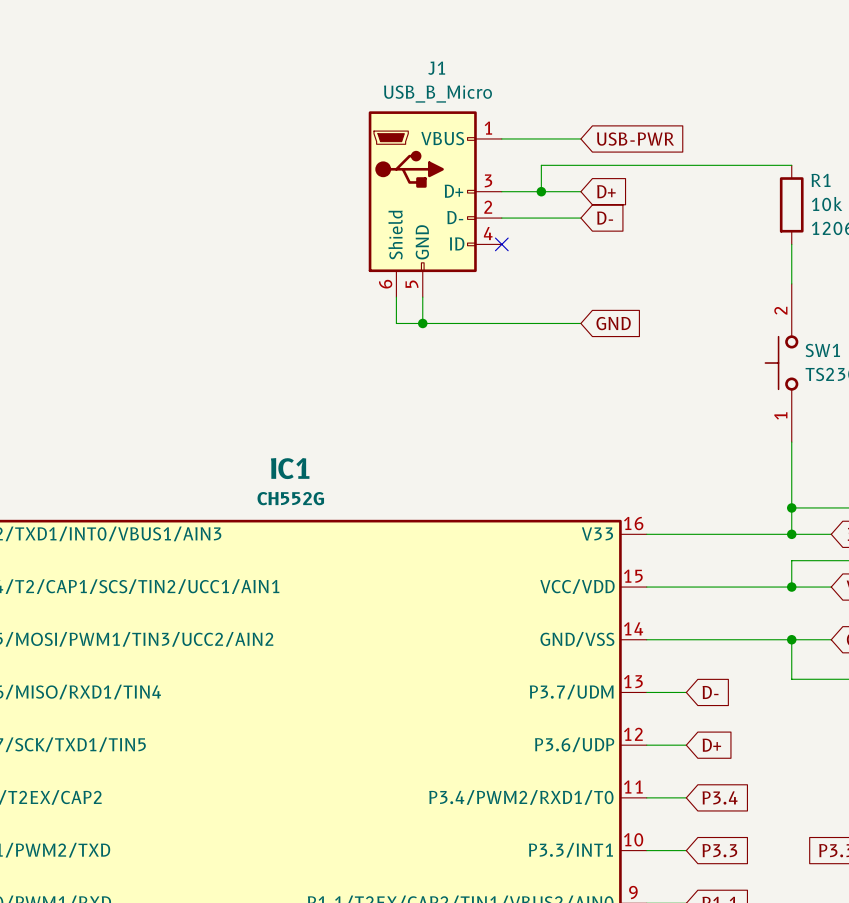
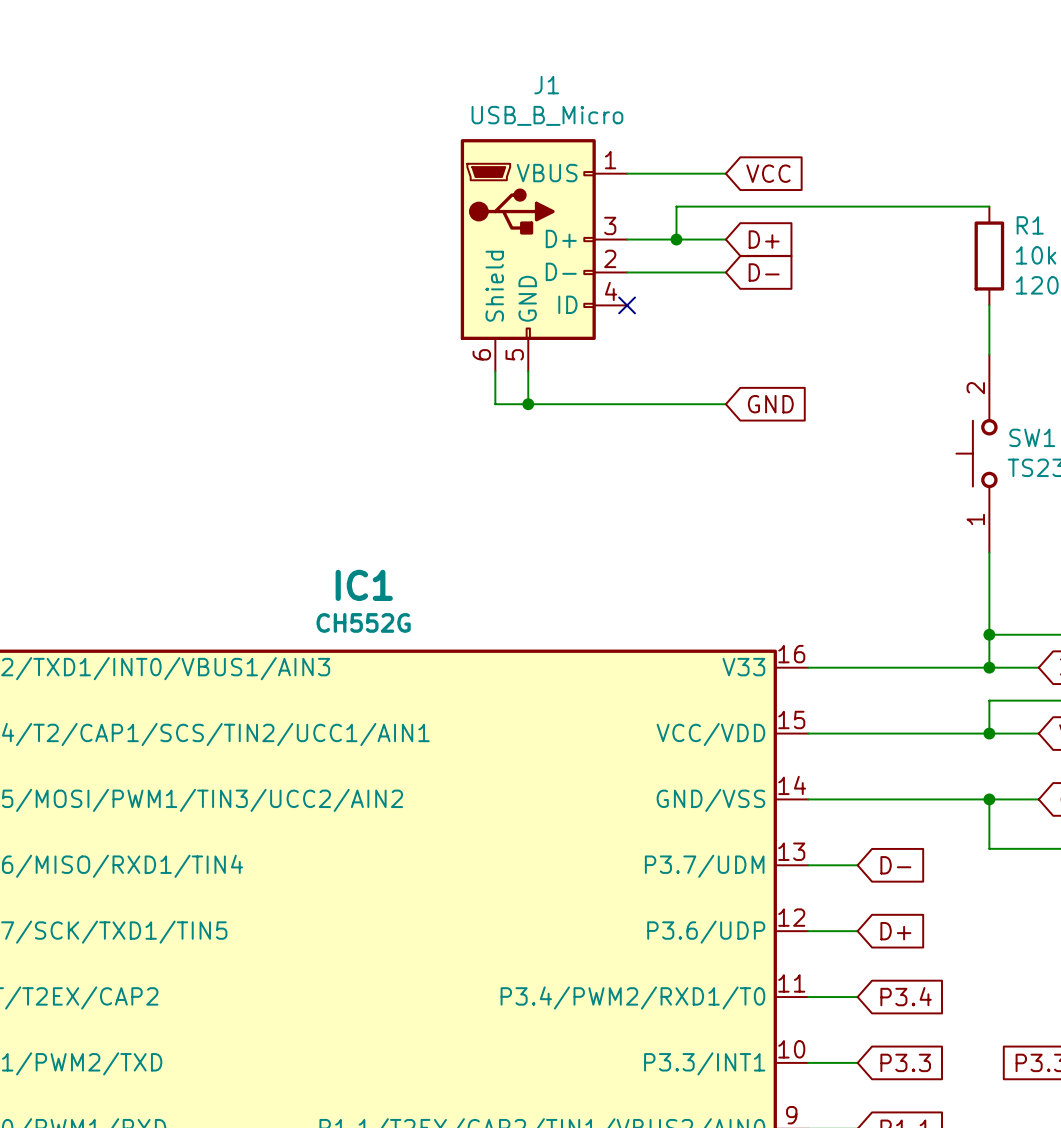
global label: USB-PWR (635, 139) -> VCC (768, 173)

